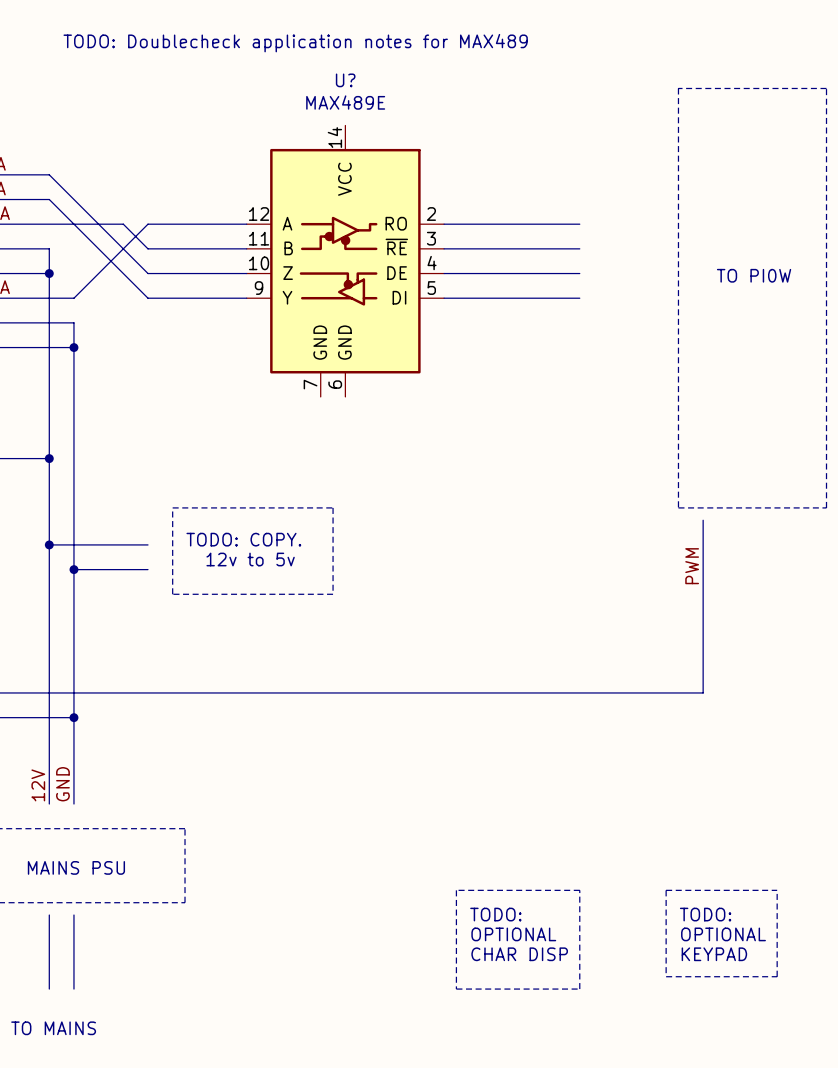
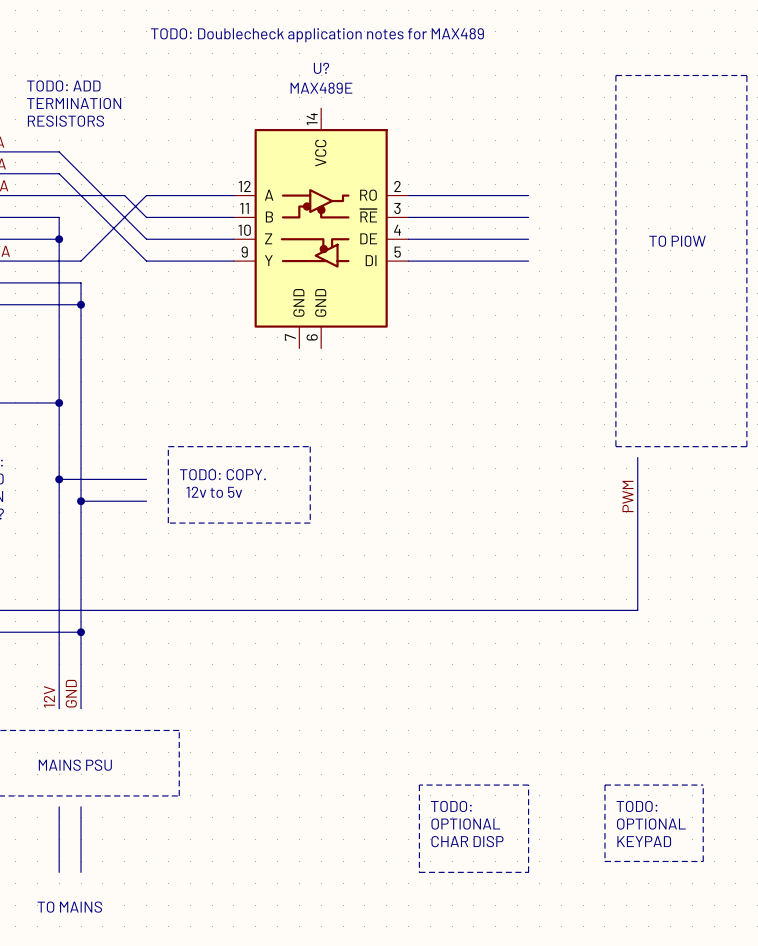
text: none -> TODO: ADD (63, 85)
text: none -> TERMINATION (74, 103)
text: none -> RESISTORS (65, 121)

